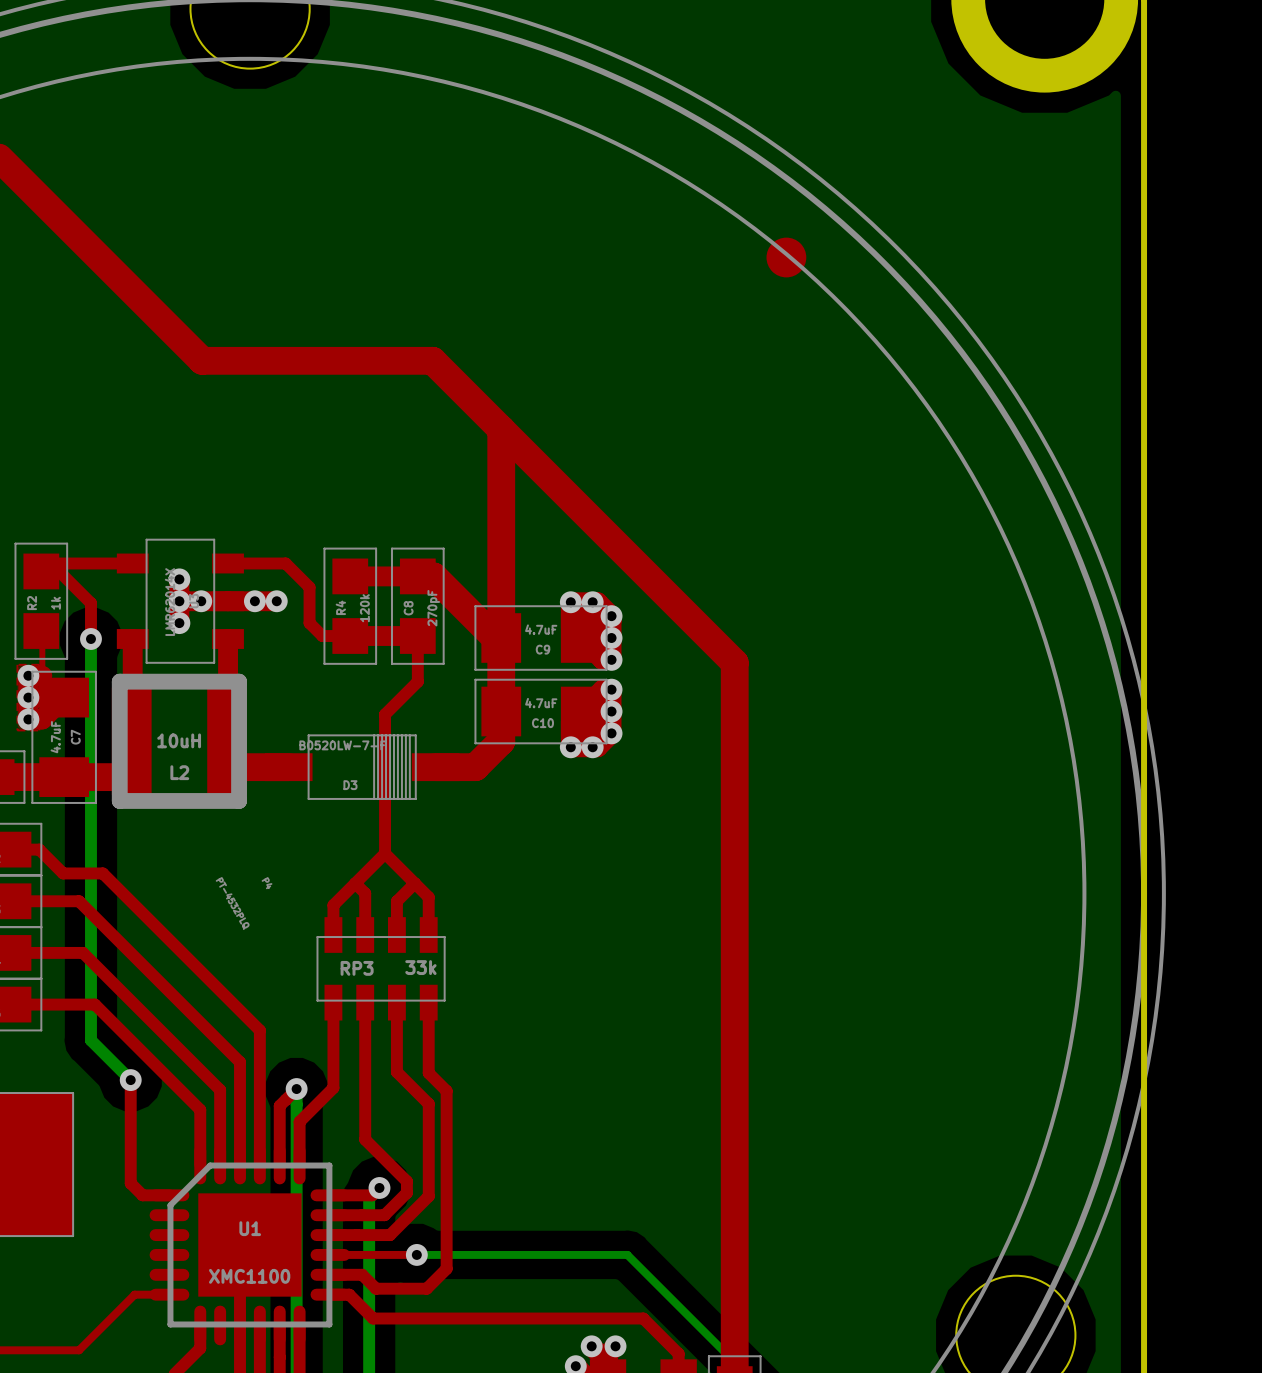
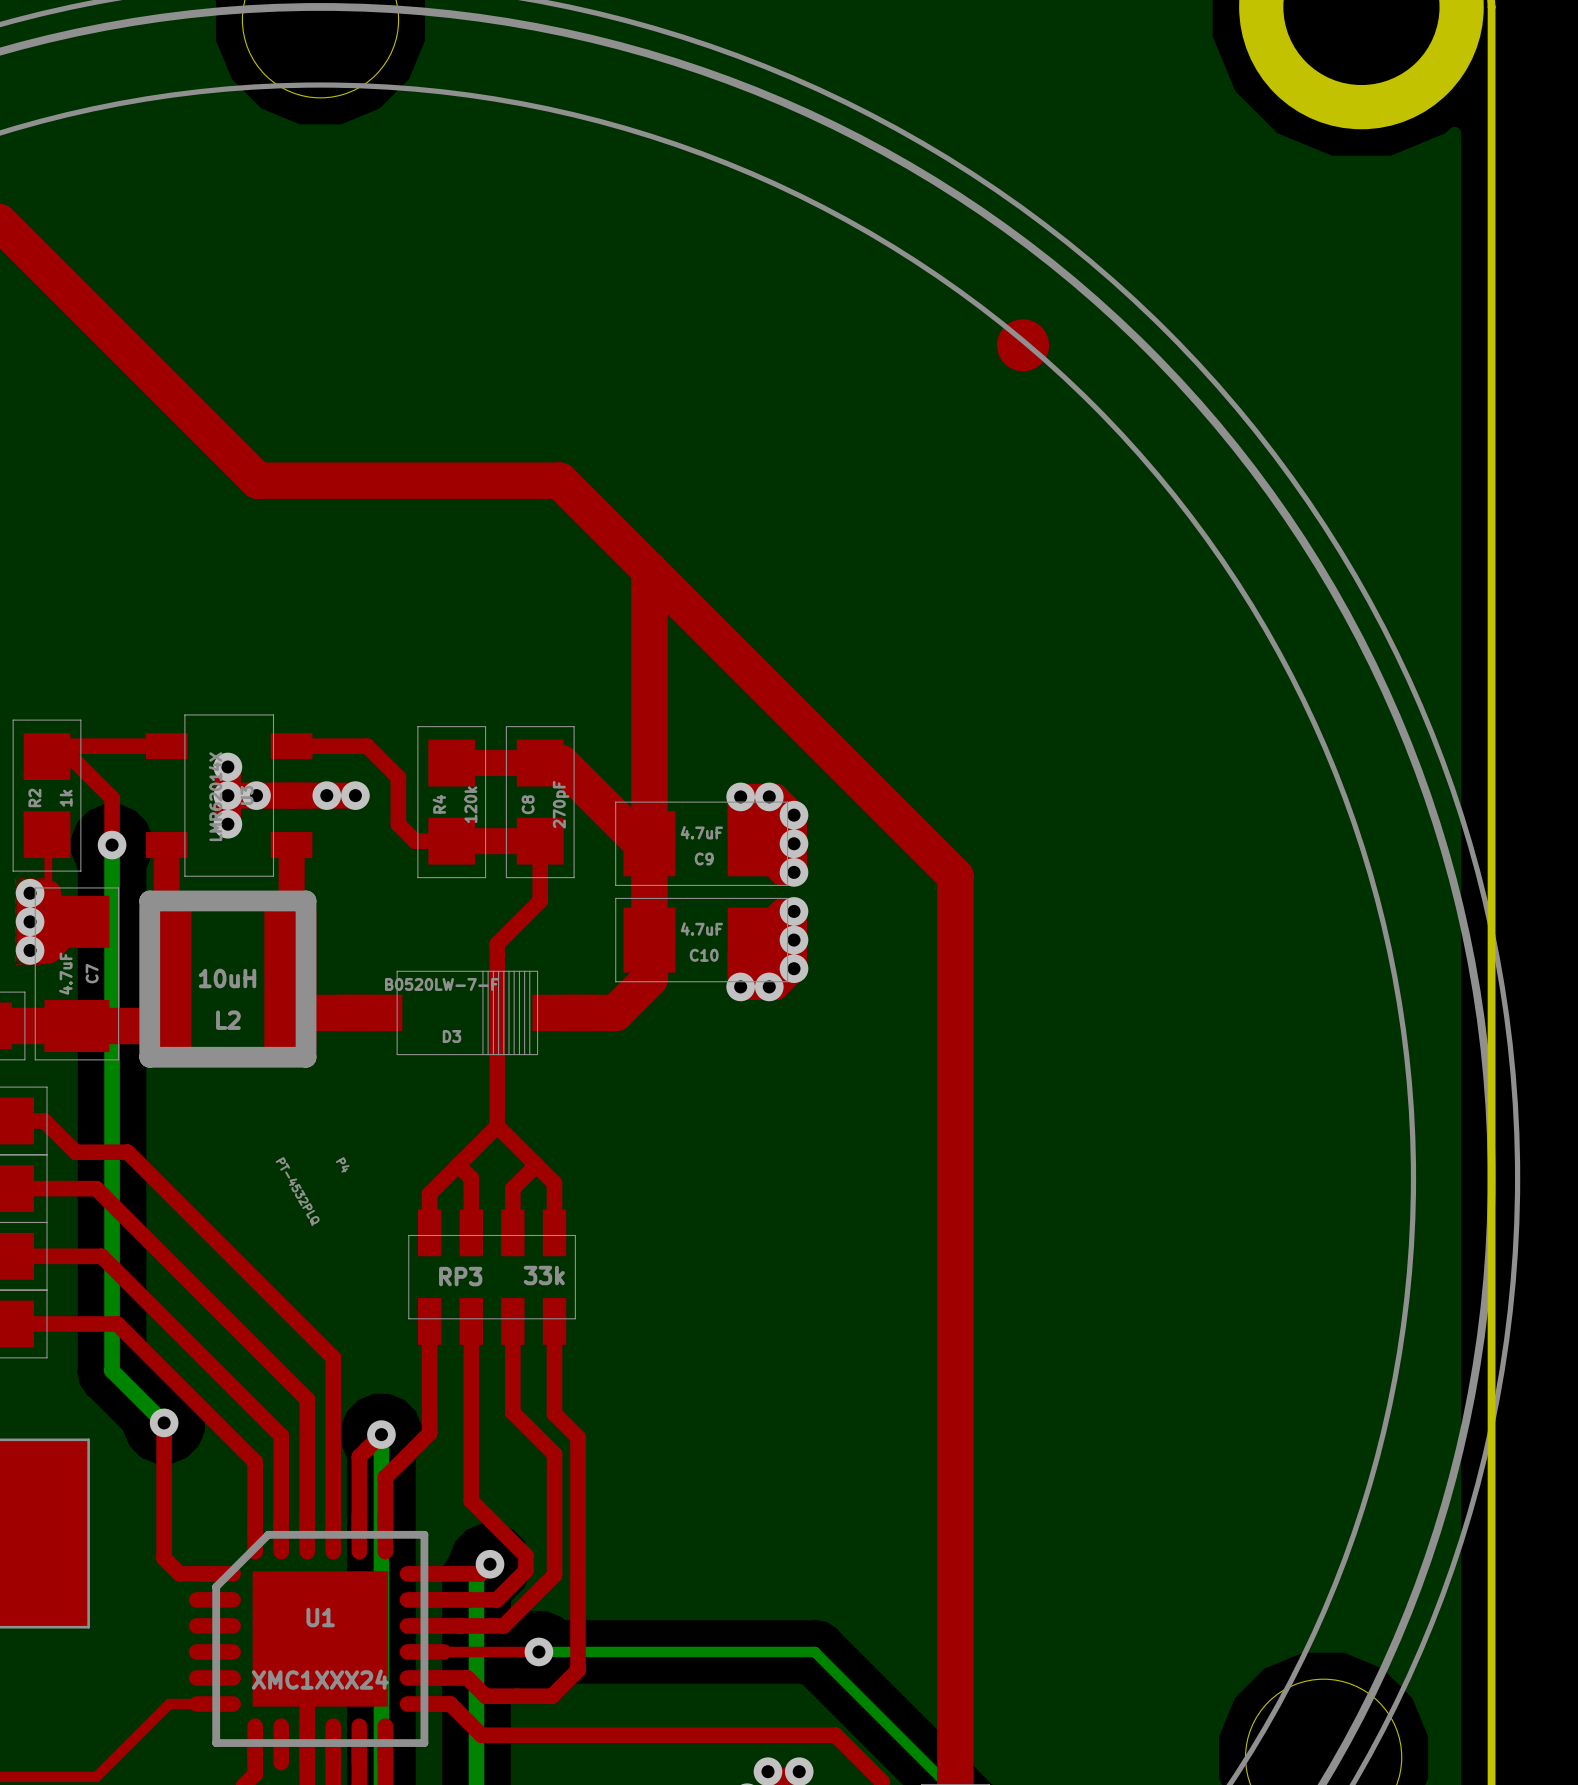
U1 value: XMC1100 (249, 1276) -> XMC1XXX24 (320, 1679)

